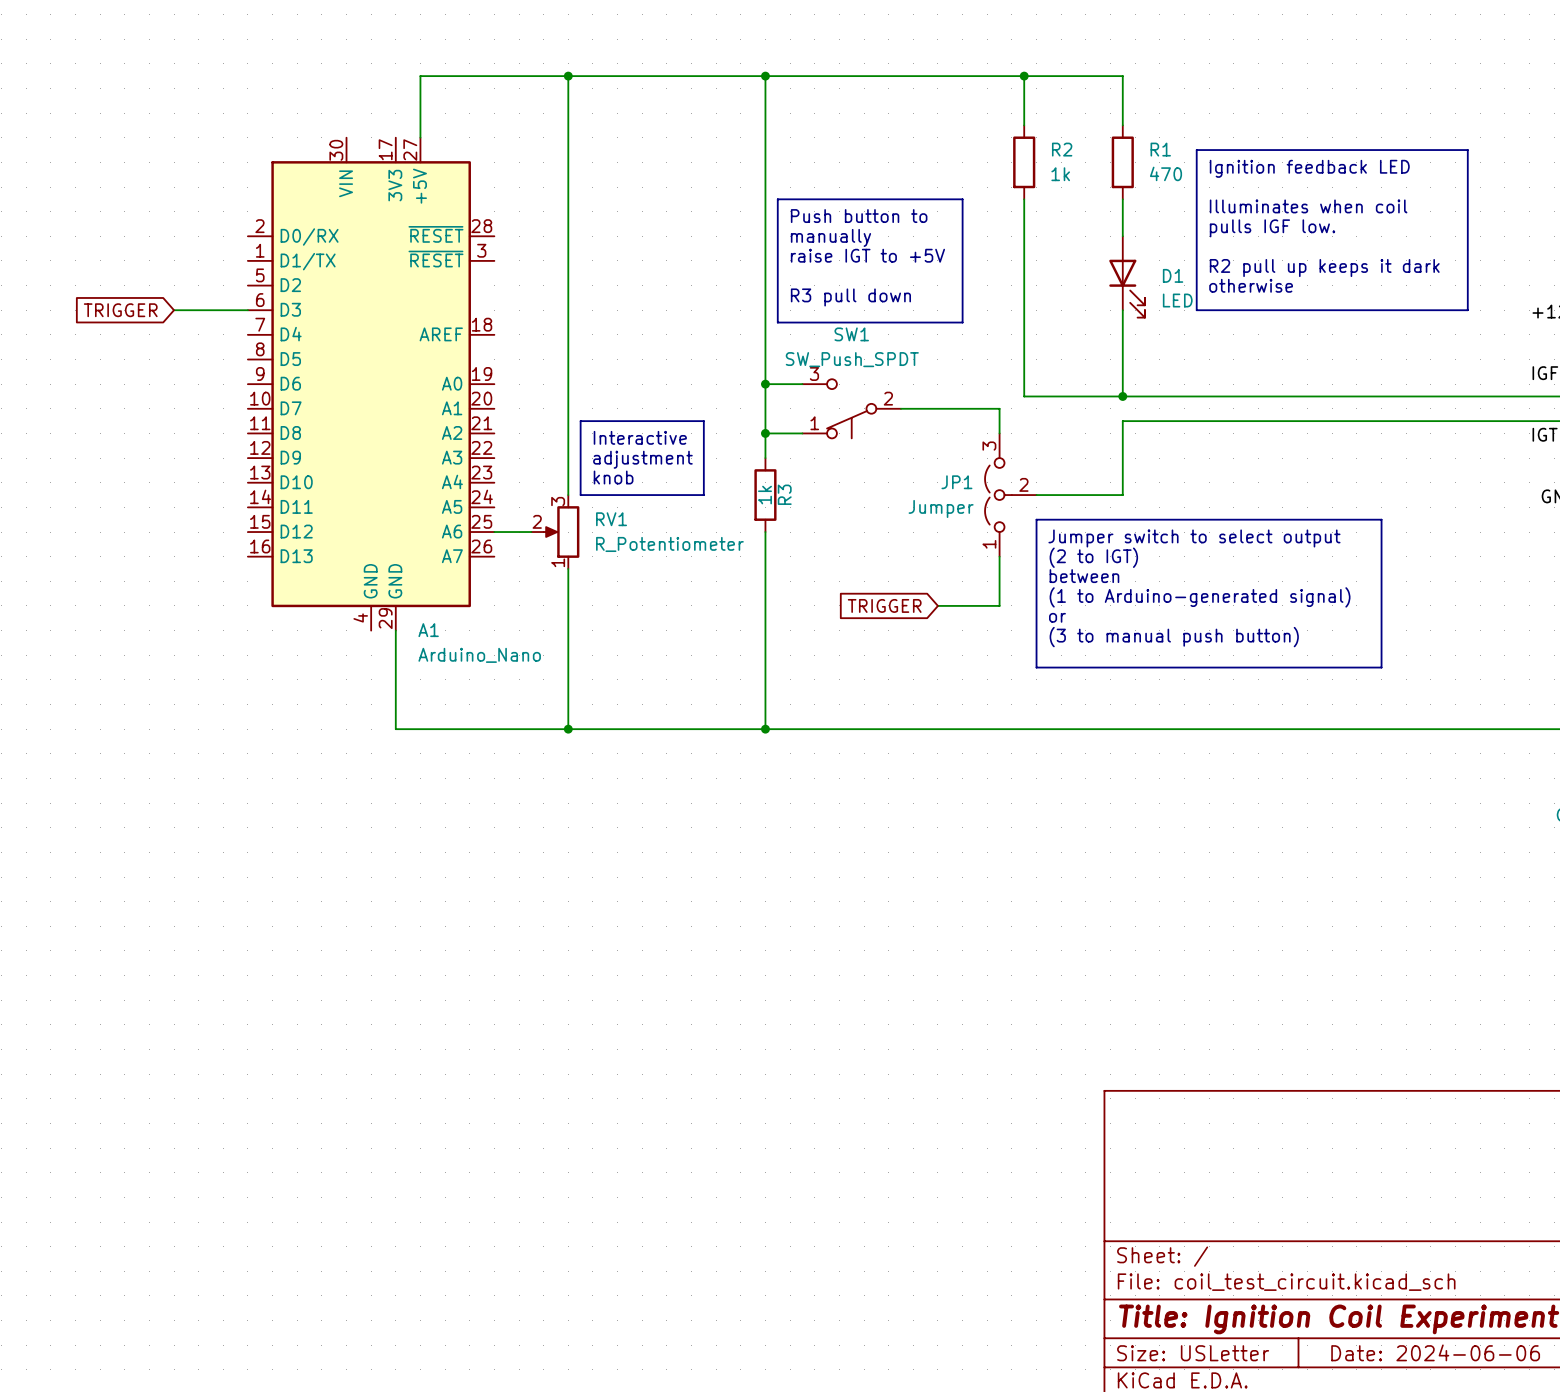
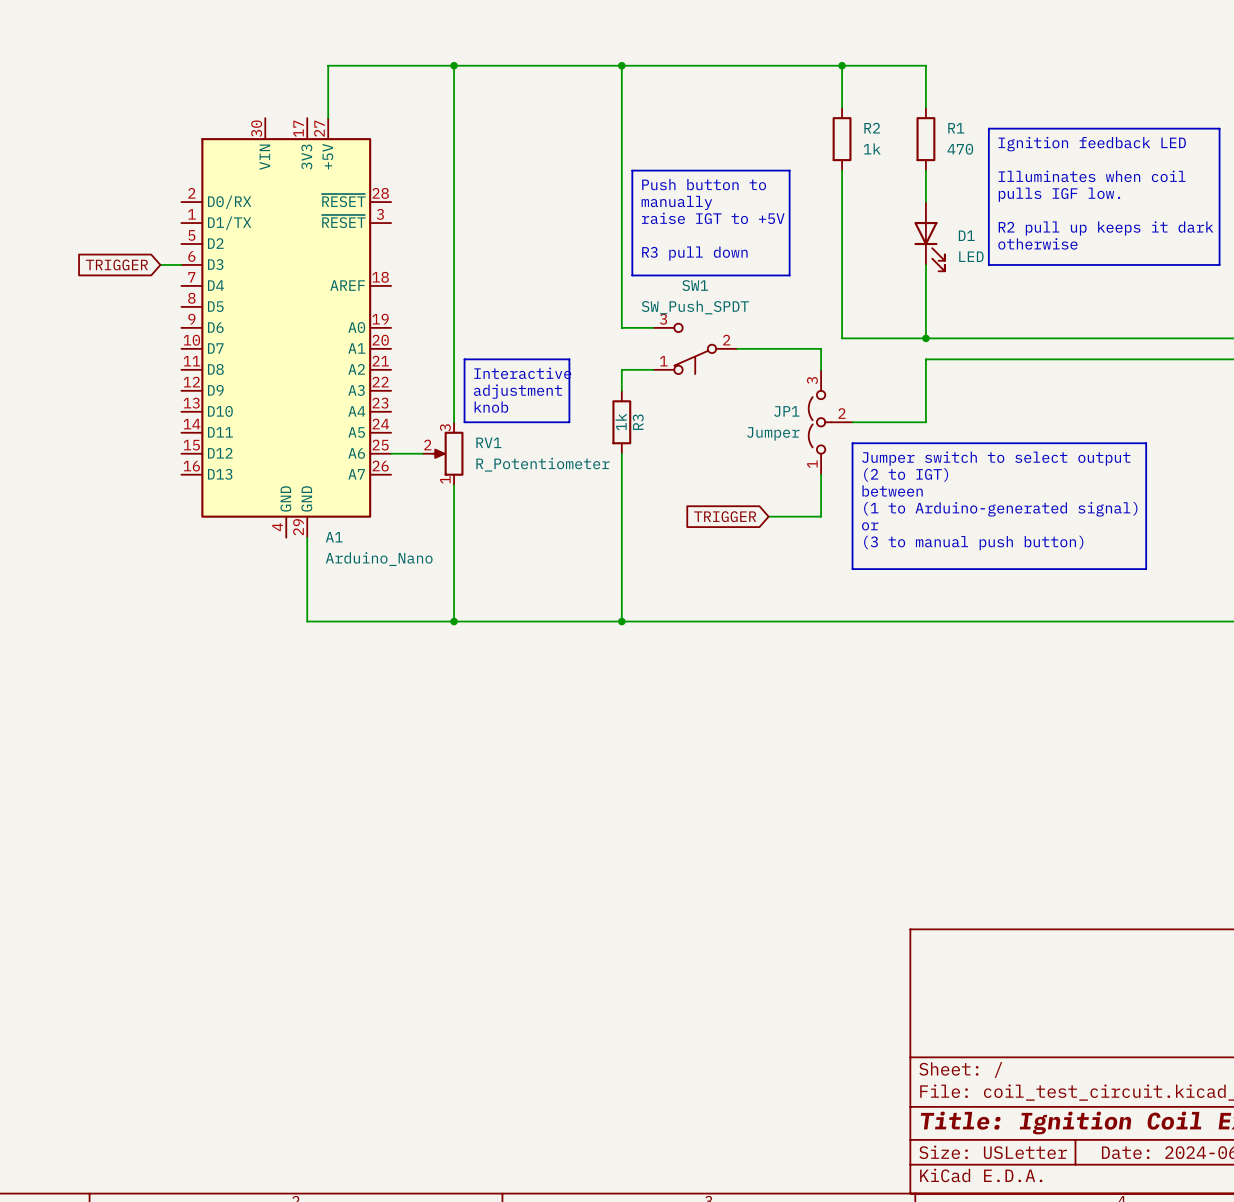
global label position: TRIGGER (120, 310) -> TRIGGER (116, 264)
wire: (174, 310) (223, 310) -> none
wire: (765, 384) (765, 433) -> none
junction: (765, 384) -> none
junction: (765, 433) -> none

